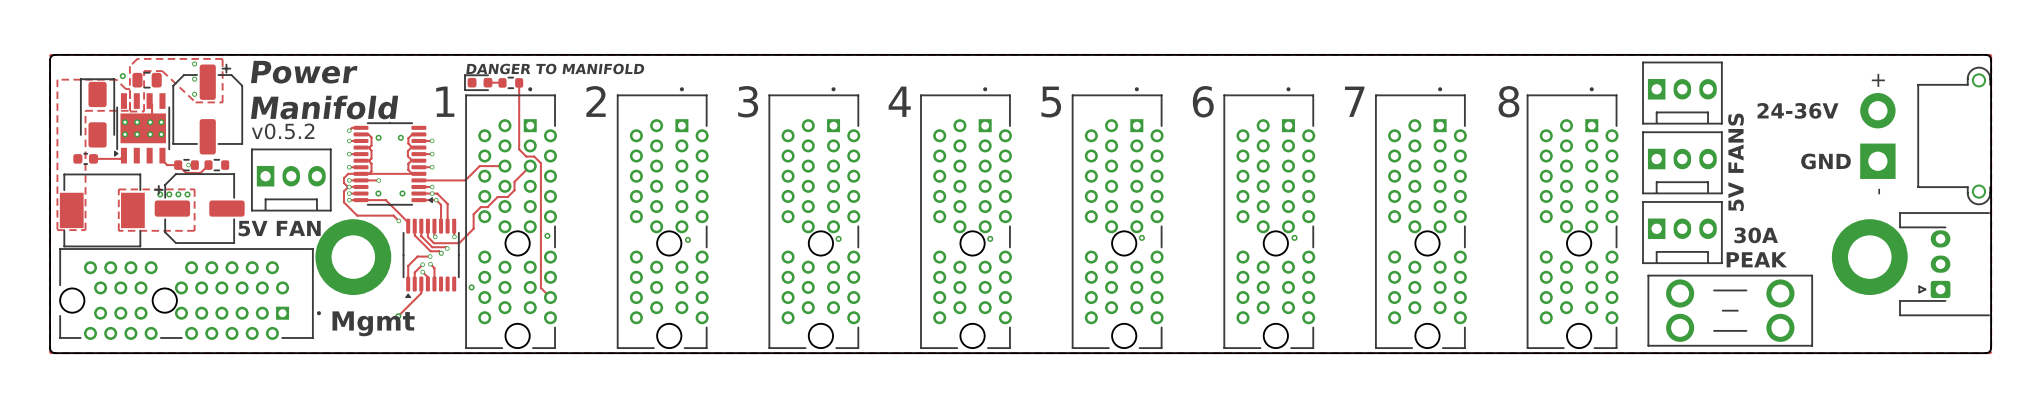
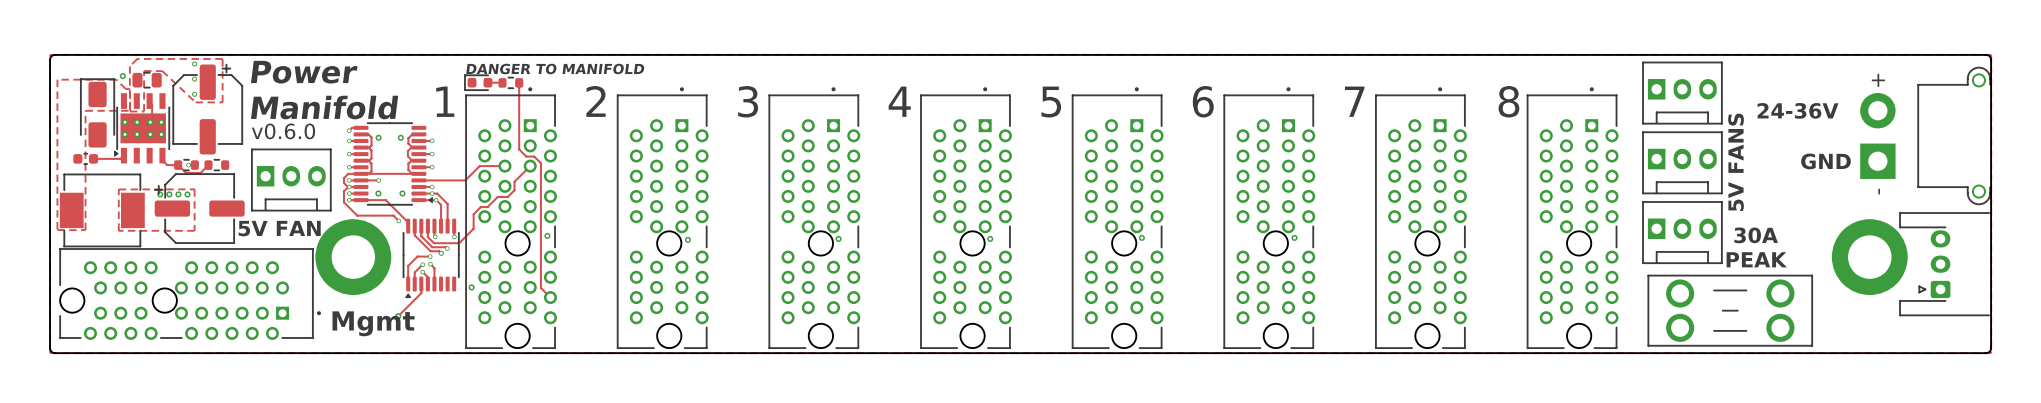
text: v0.5.2 (283, 131) -> v0.6.0 (283, 131)

